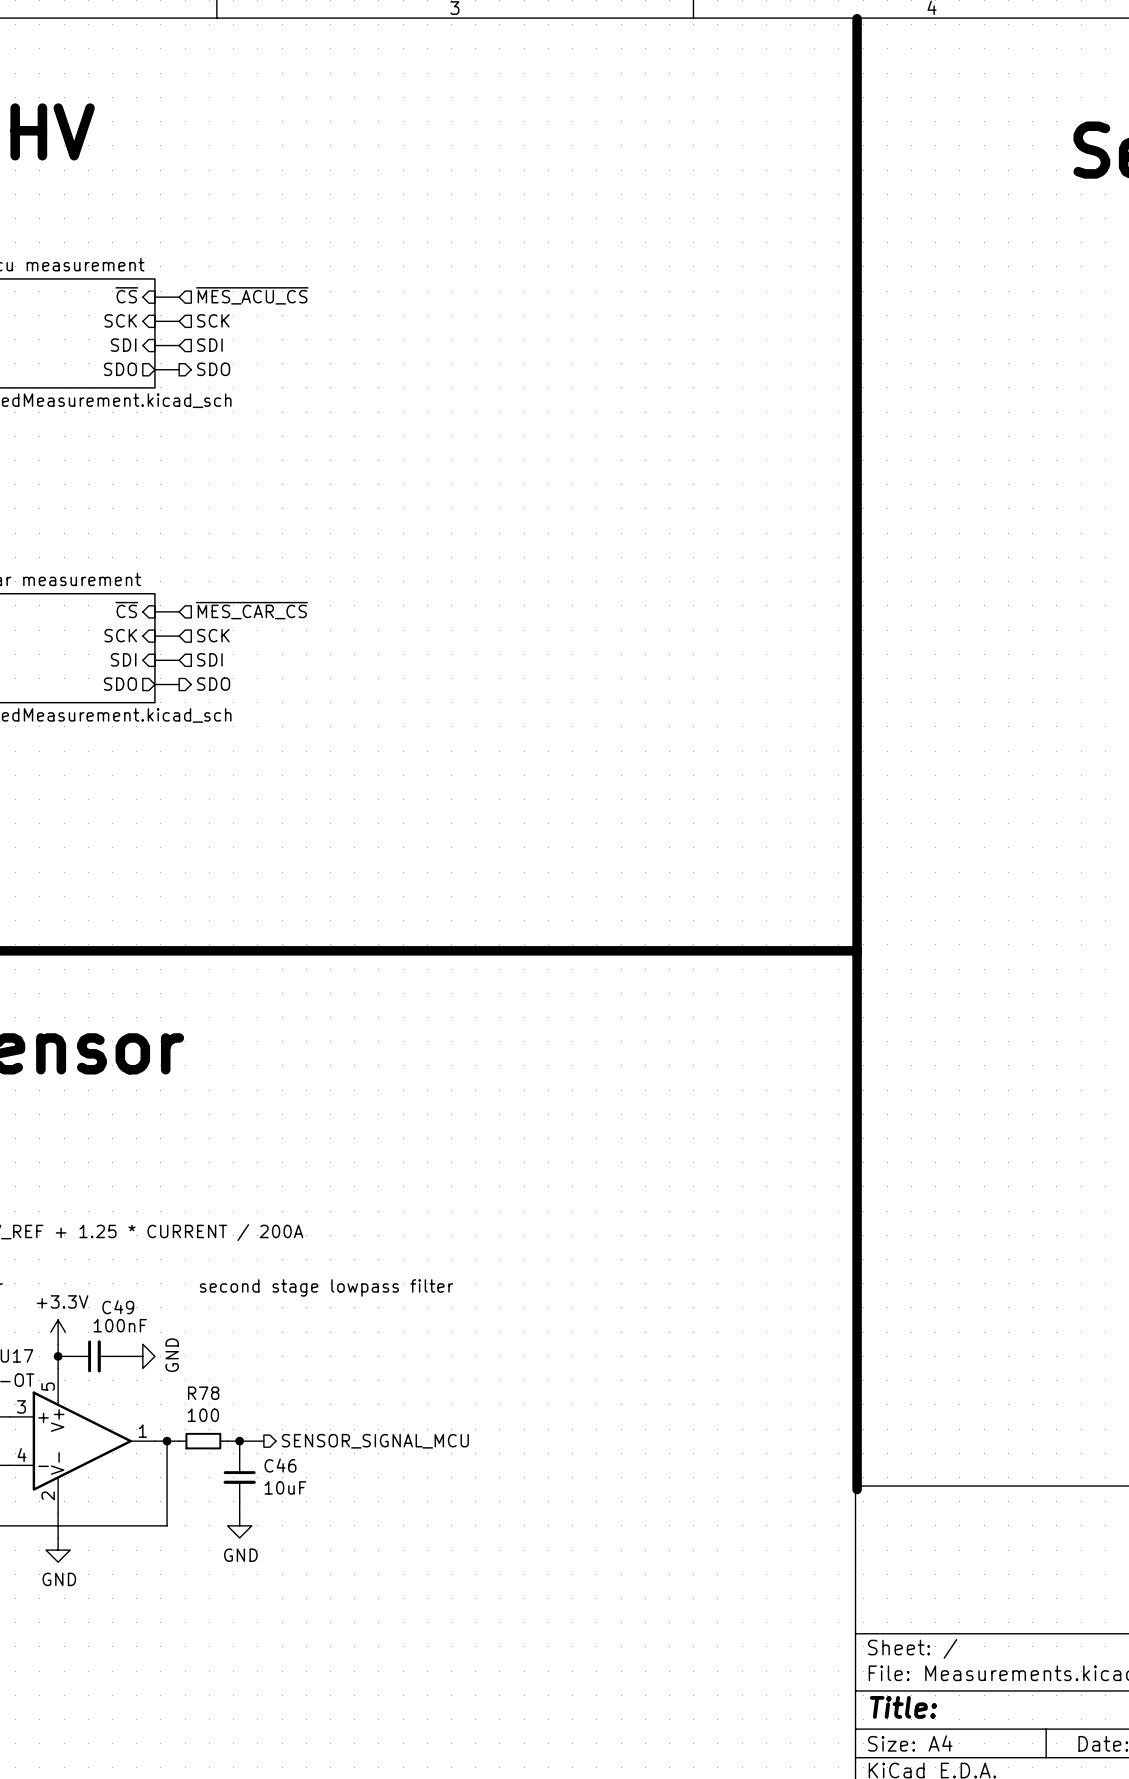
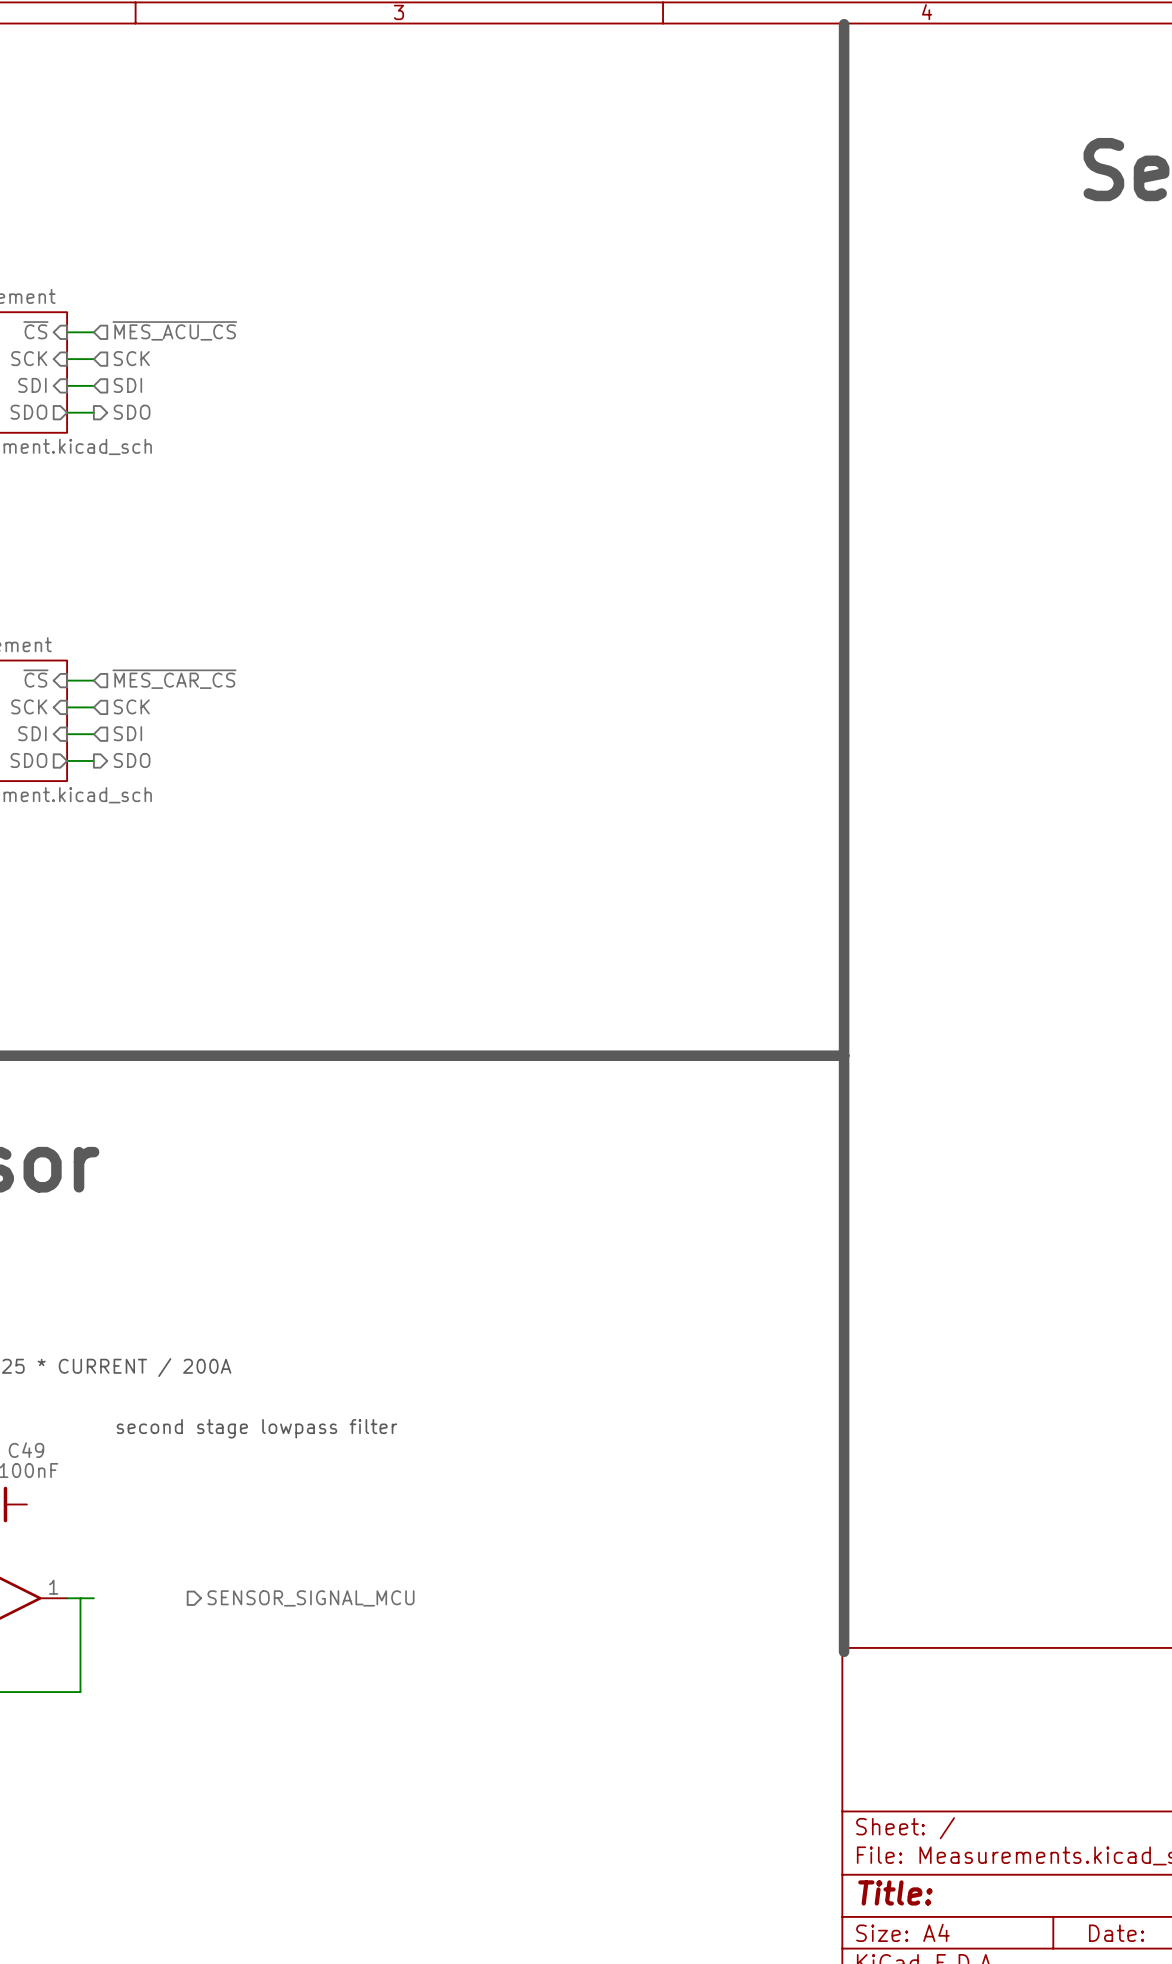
wire: (118, 1356) (130, 1356) -> none
power symbol: GND (142, 1356) -> none
junction: (167, 1441) -> none
R78: 100 (203, 1441) -> none
wire: (227, 1441) (263, 1441) -> none
wire: (239, 1441) (239, 1453) -> none
junction: (239, 1441) -> none
C46: 10uF (239, 1477) -> none
wire: (239, 1501) (239, 1513) -> none
power symbol: GND (239, 1525) -> none

